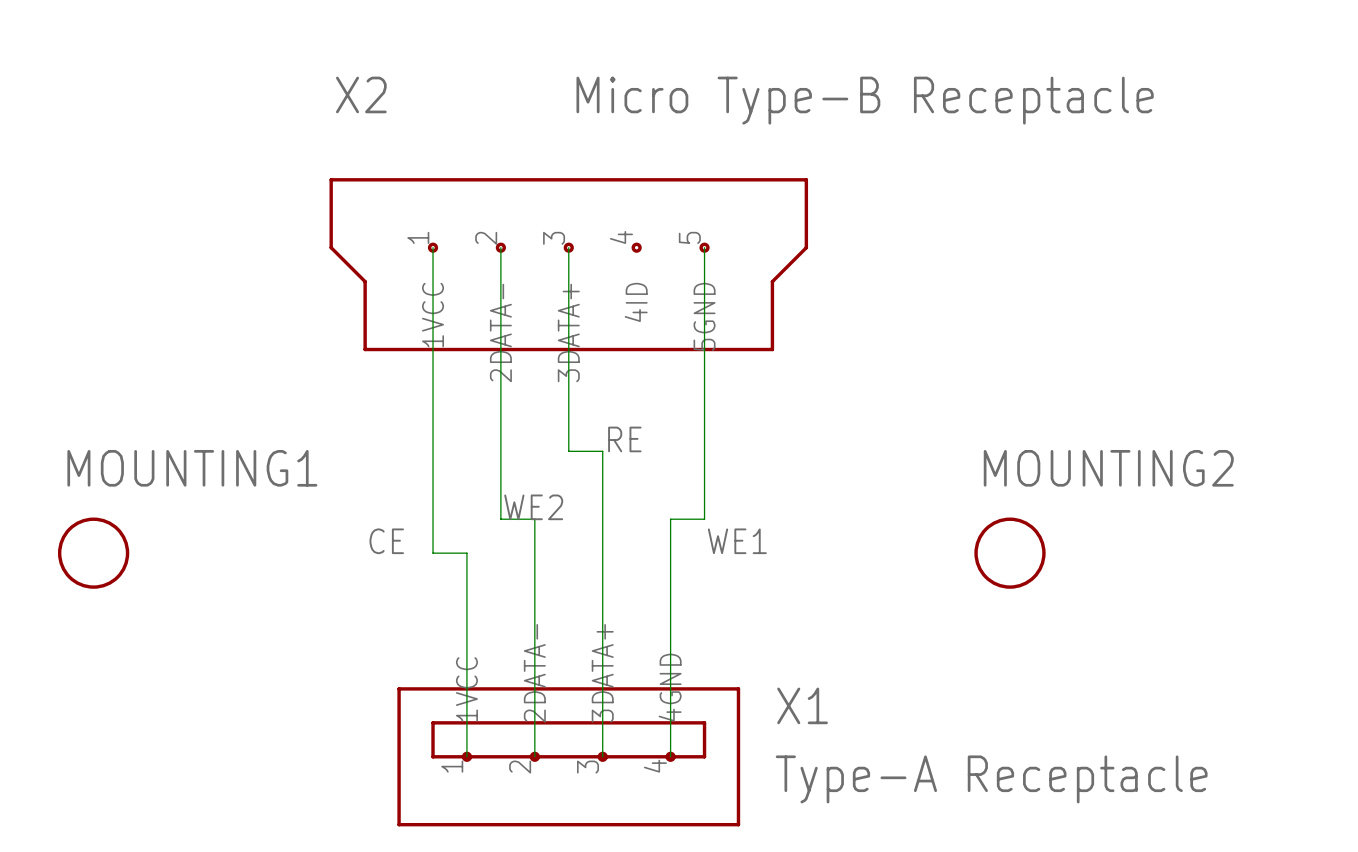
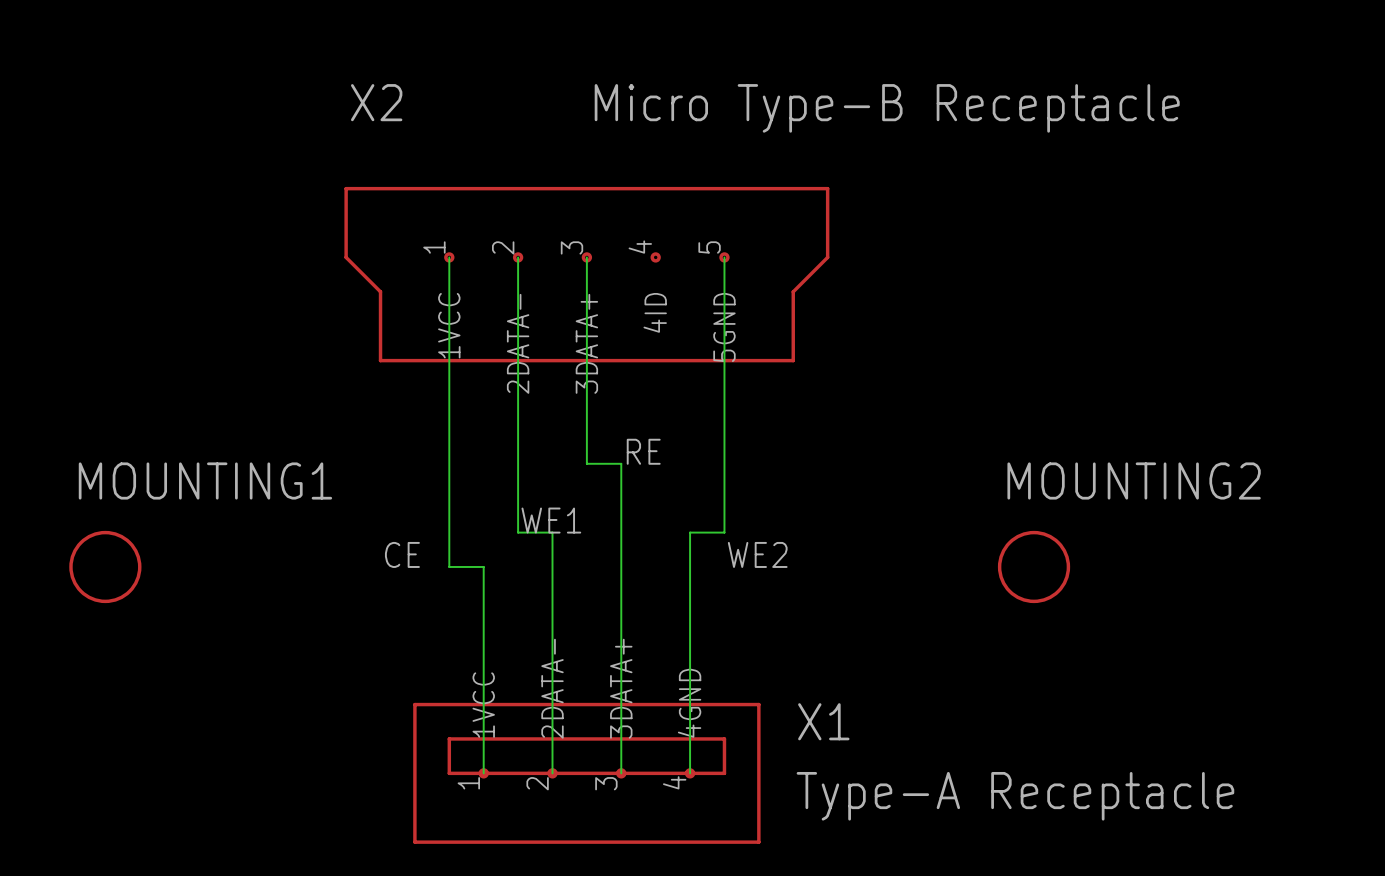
label: WE2 (533, 507) -> WE1 (551, 520)
label: WE1 (737, 541) -> WE2 (757, 554)

